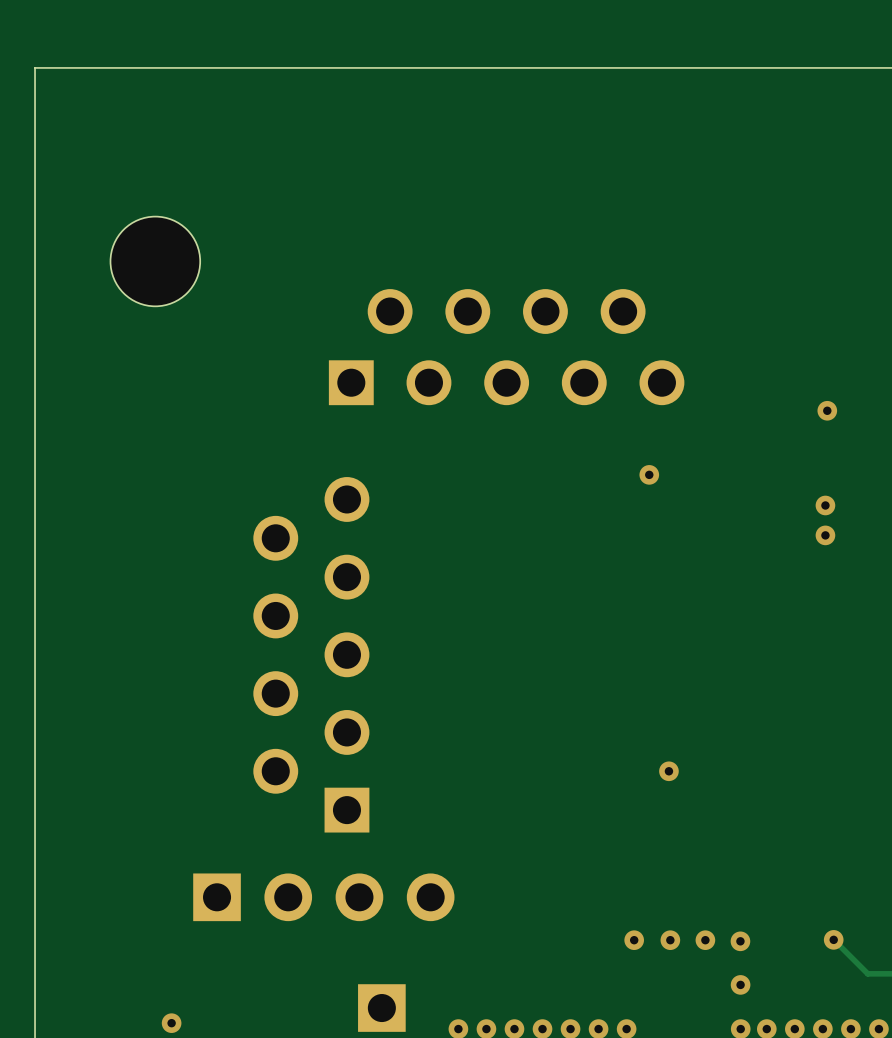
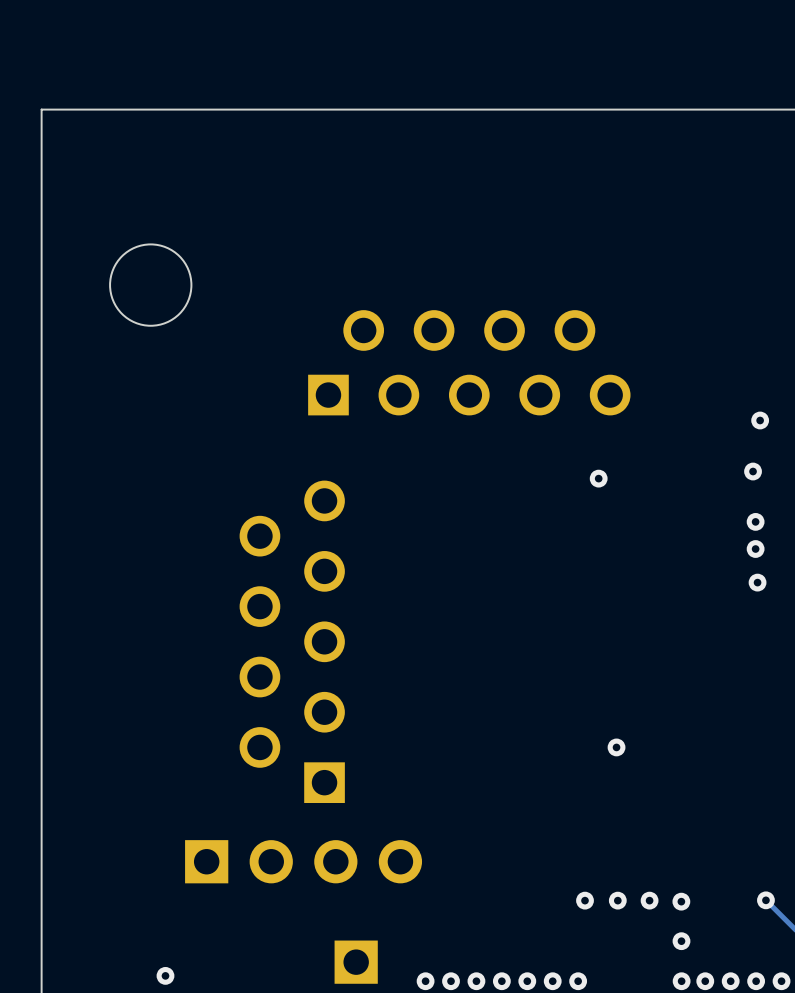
via: none -> (753, 471)
via: (825, 505) -> none
via: none -> (755, 521)
via: (825, 535) -> none
via: none -> (755, 549)
via: none -> (757, 582)

